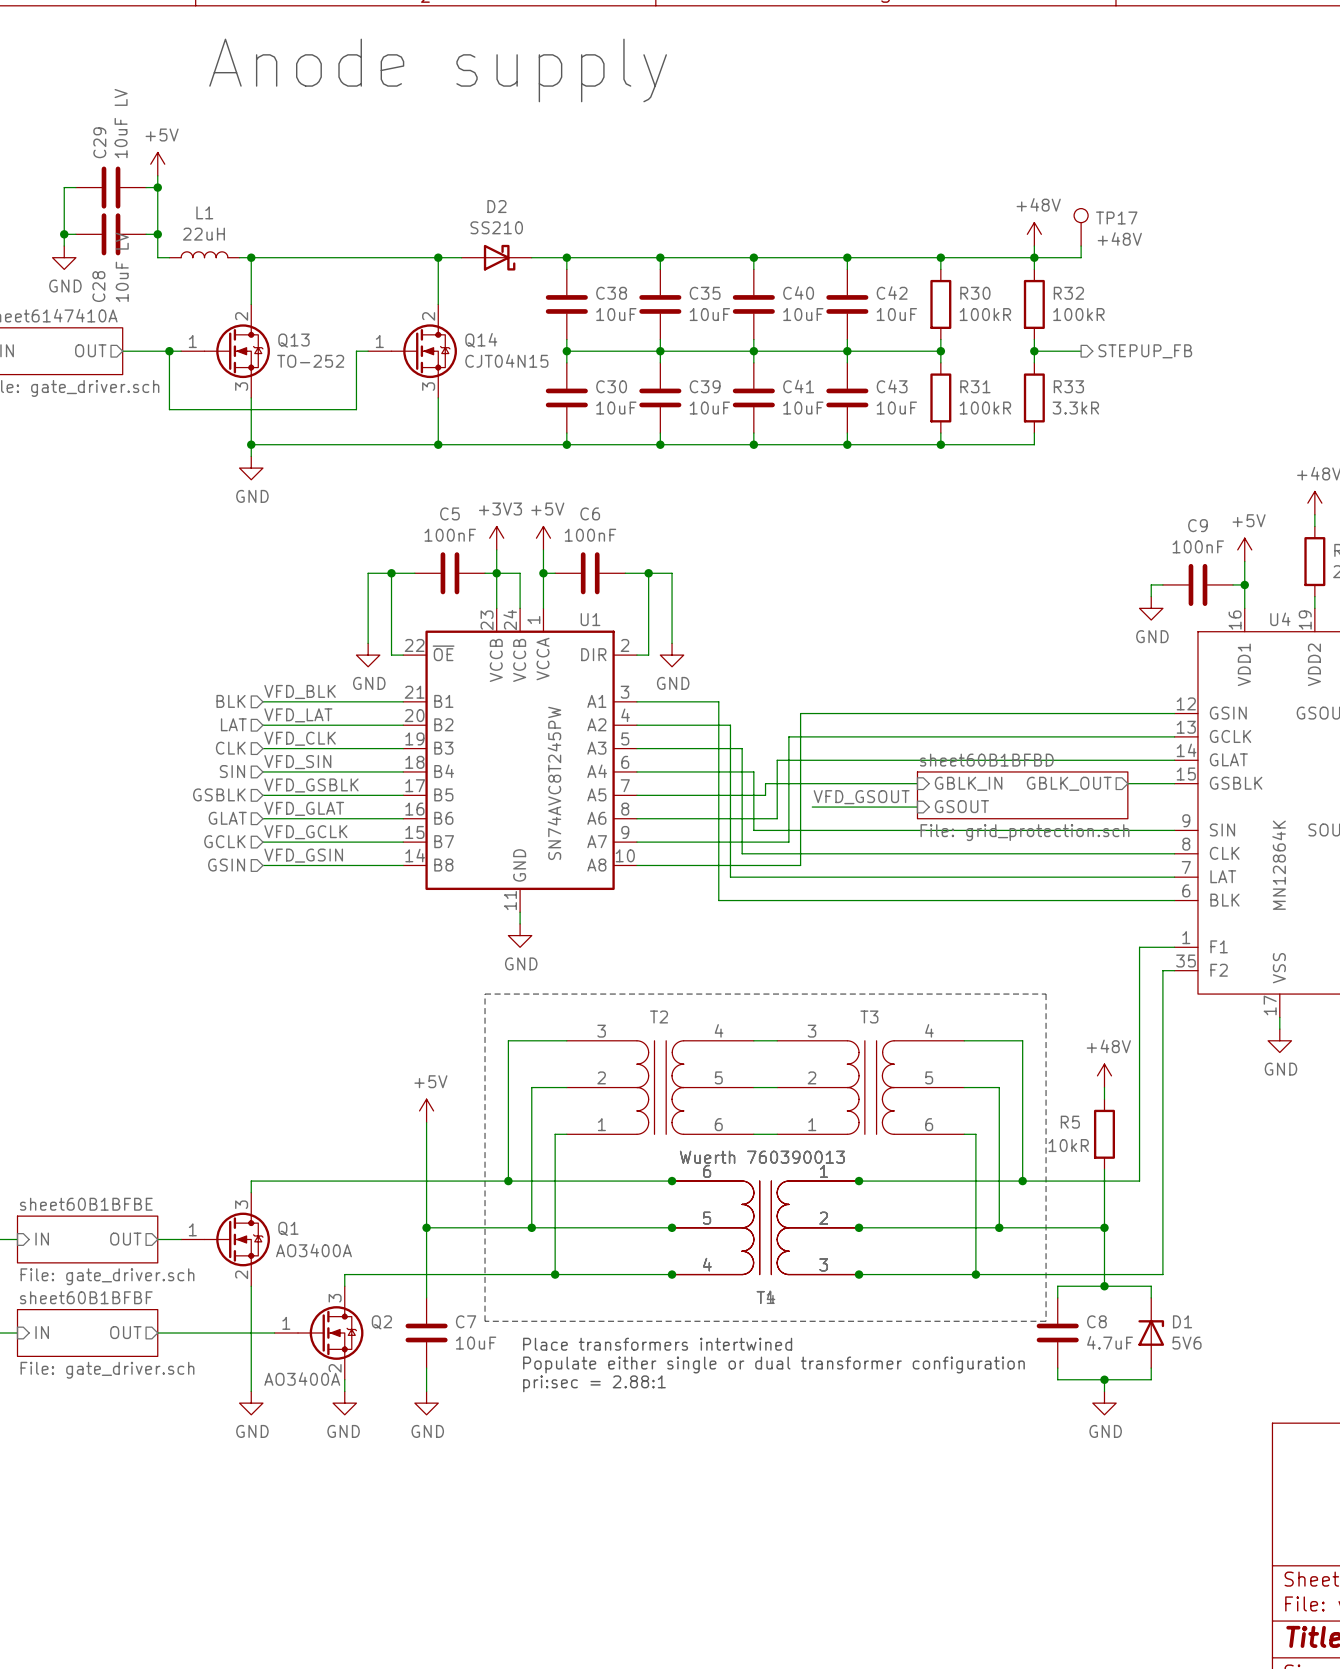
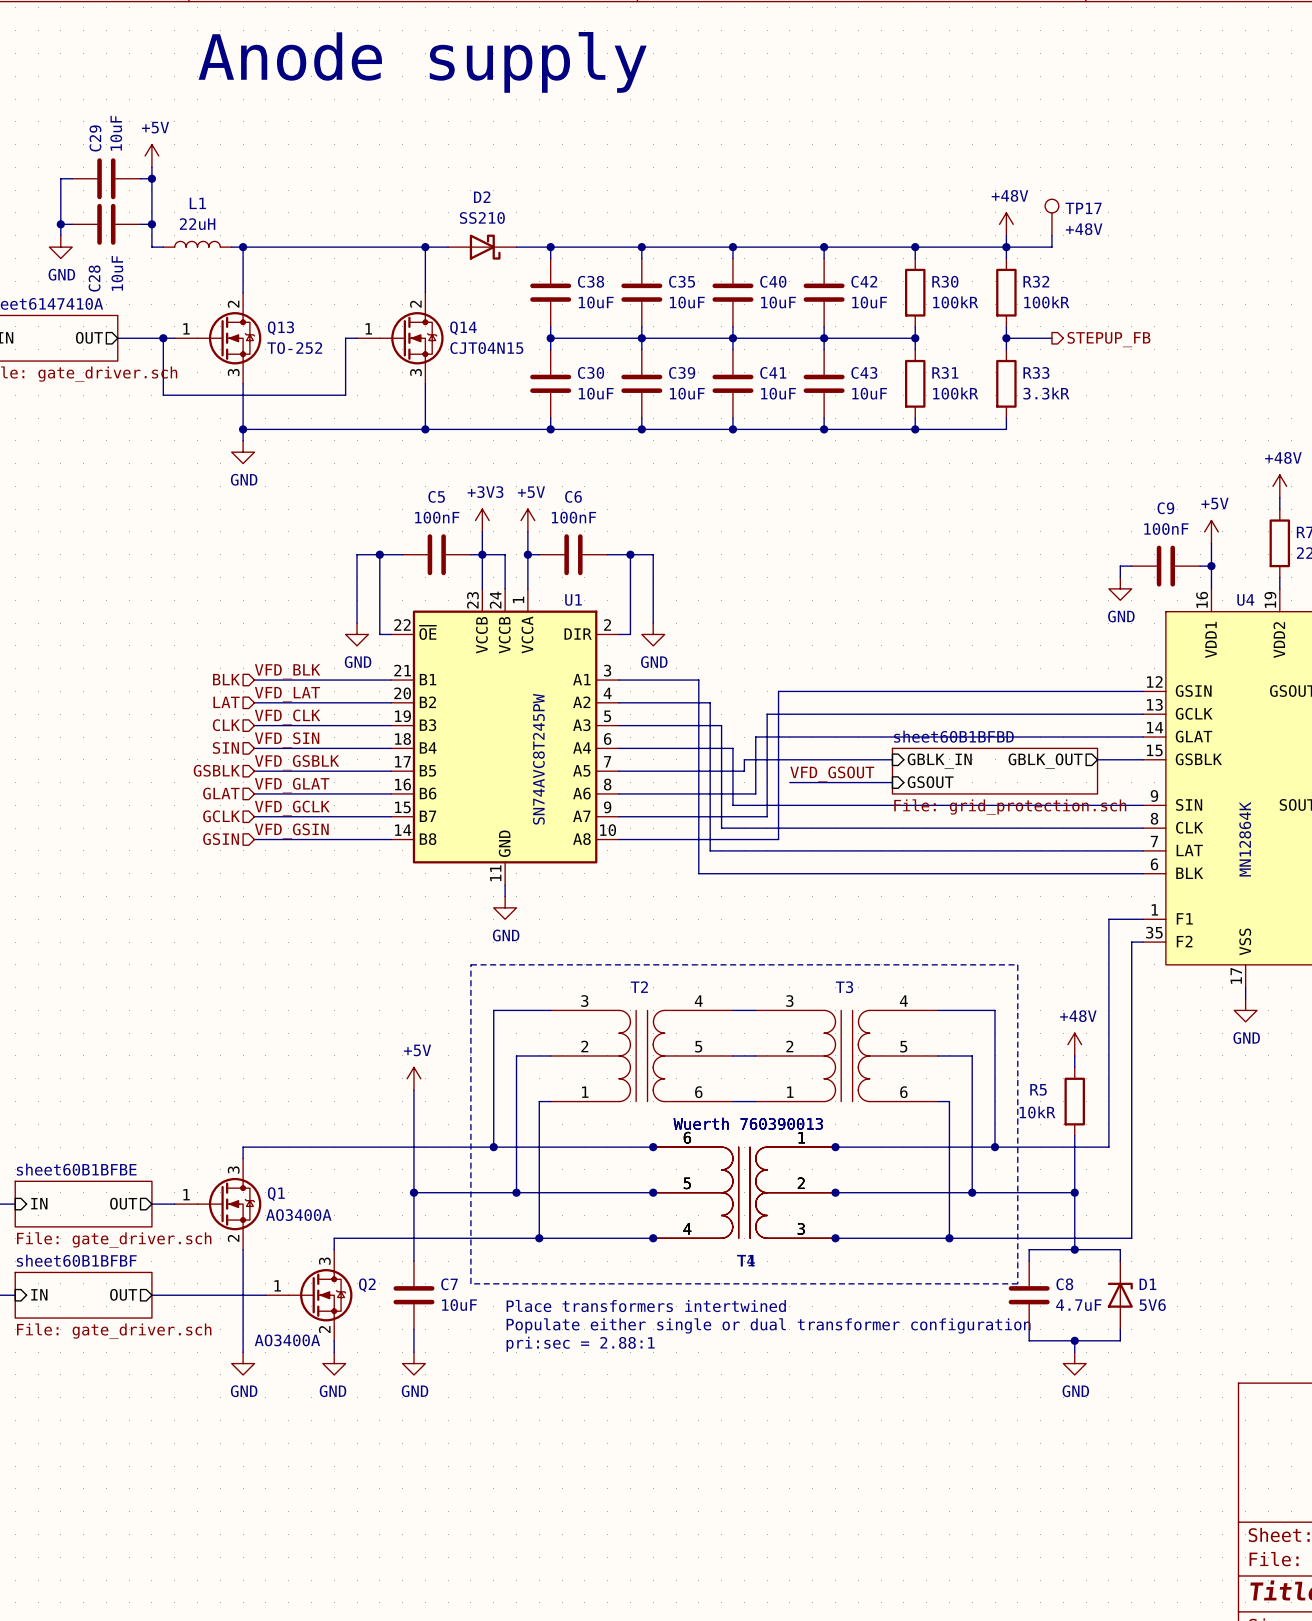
C29 value: 10uF LV (121, 123) -> 10uF (116, 133)
C28 value: 10uF LV (122, 267) -> 10uF (117, 273)

